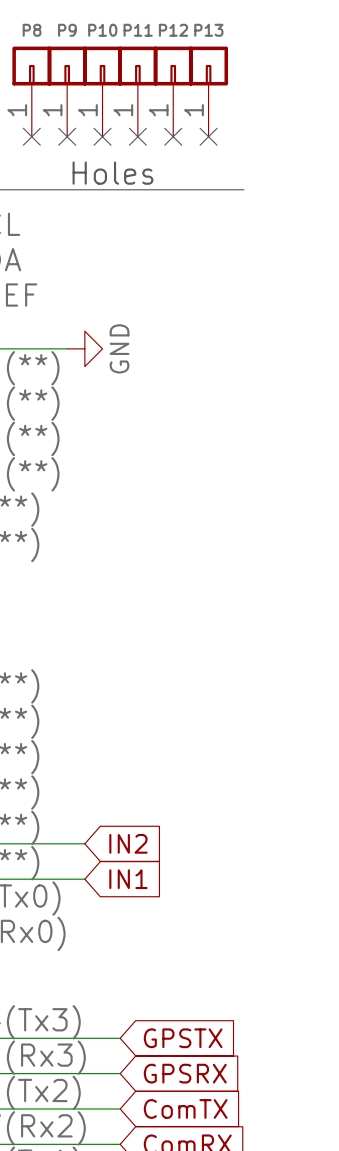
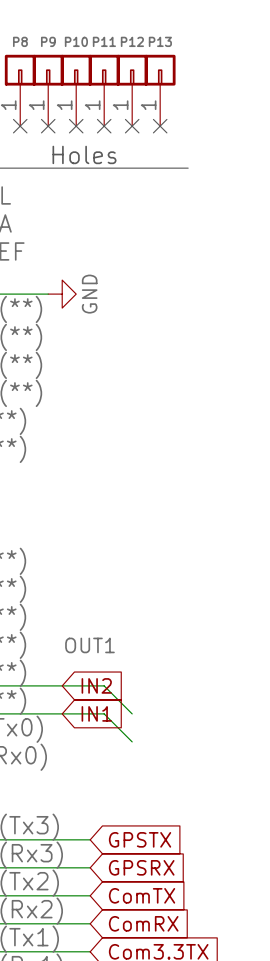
label: none -> OUT1 (89, 645)
wire: none -> (62, 685) (104, 685) (132, 713)
wire: none -> (62, 713) (104, 713) (132, 741)

